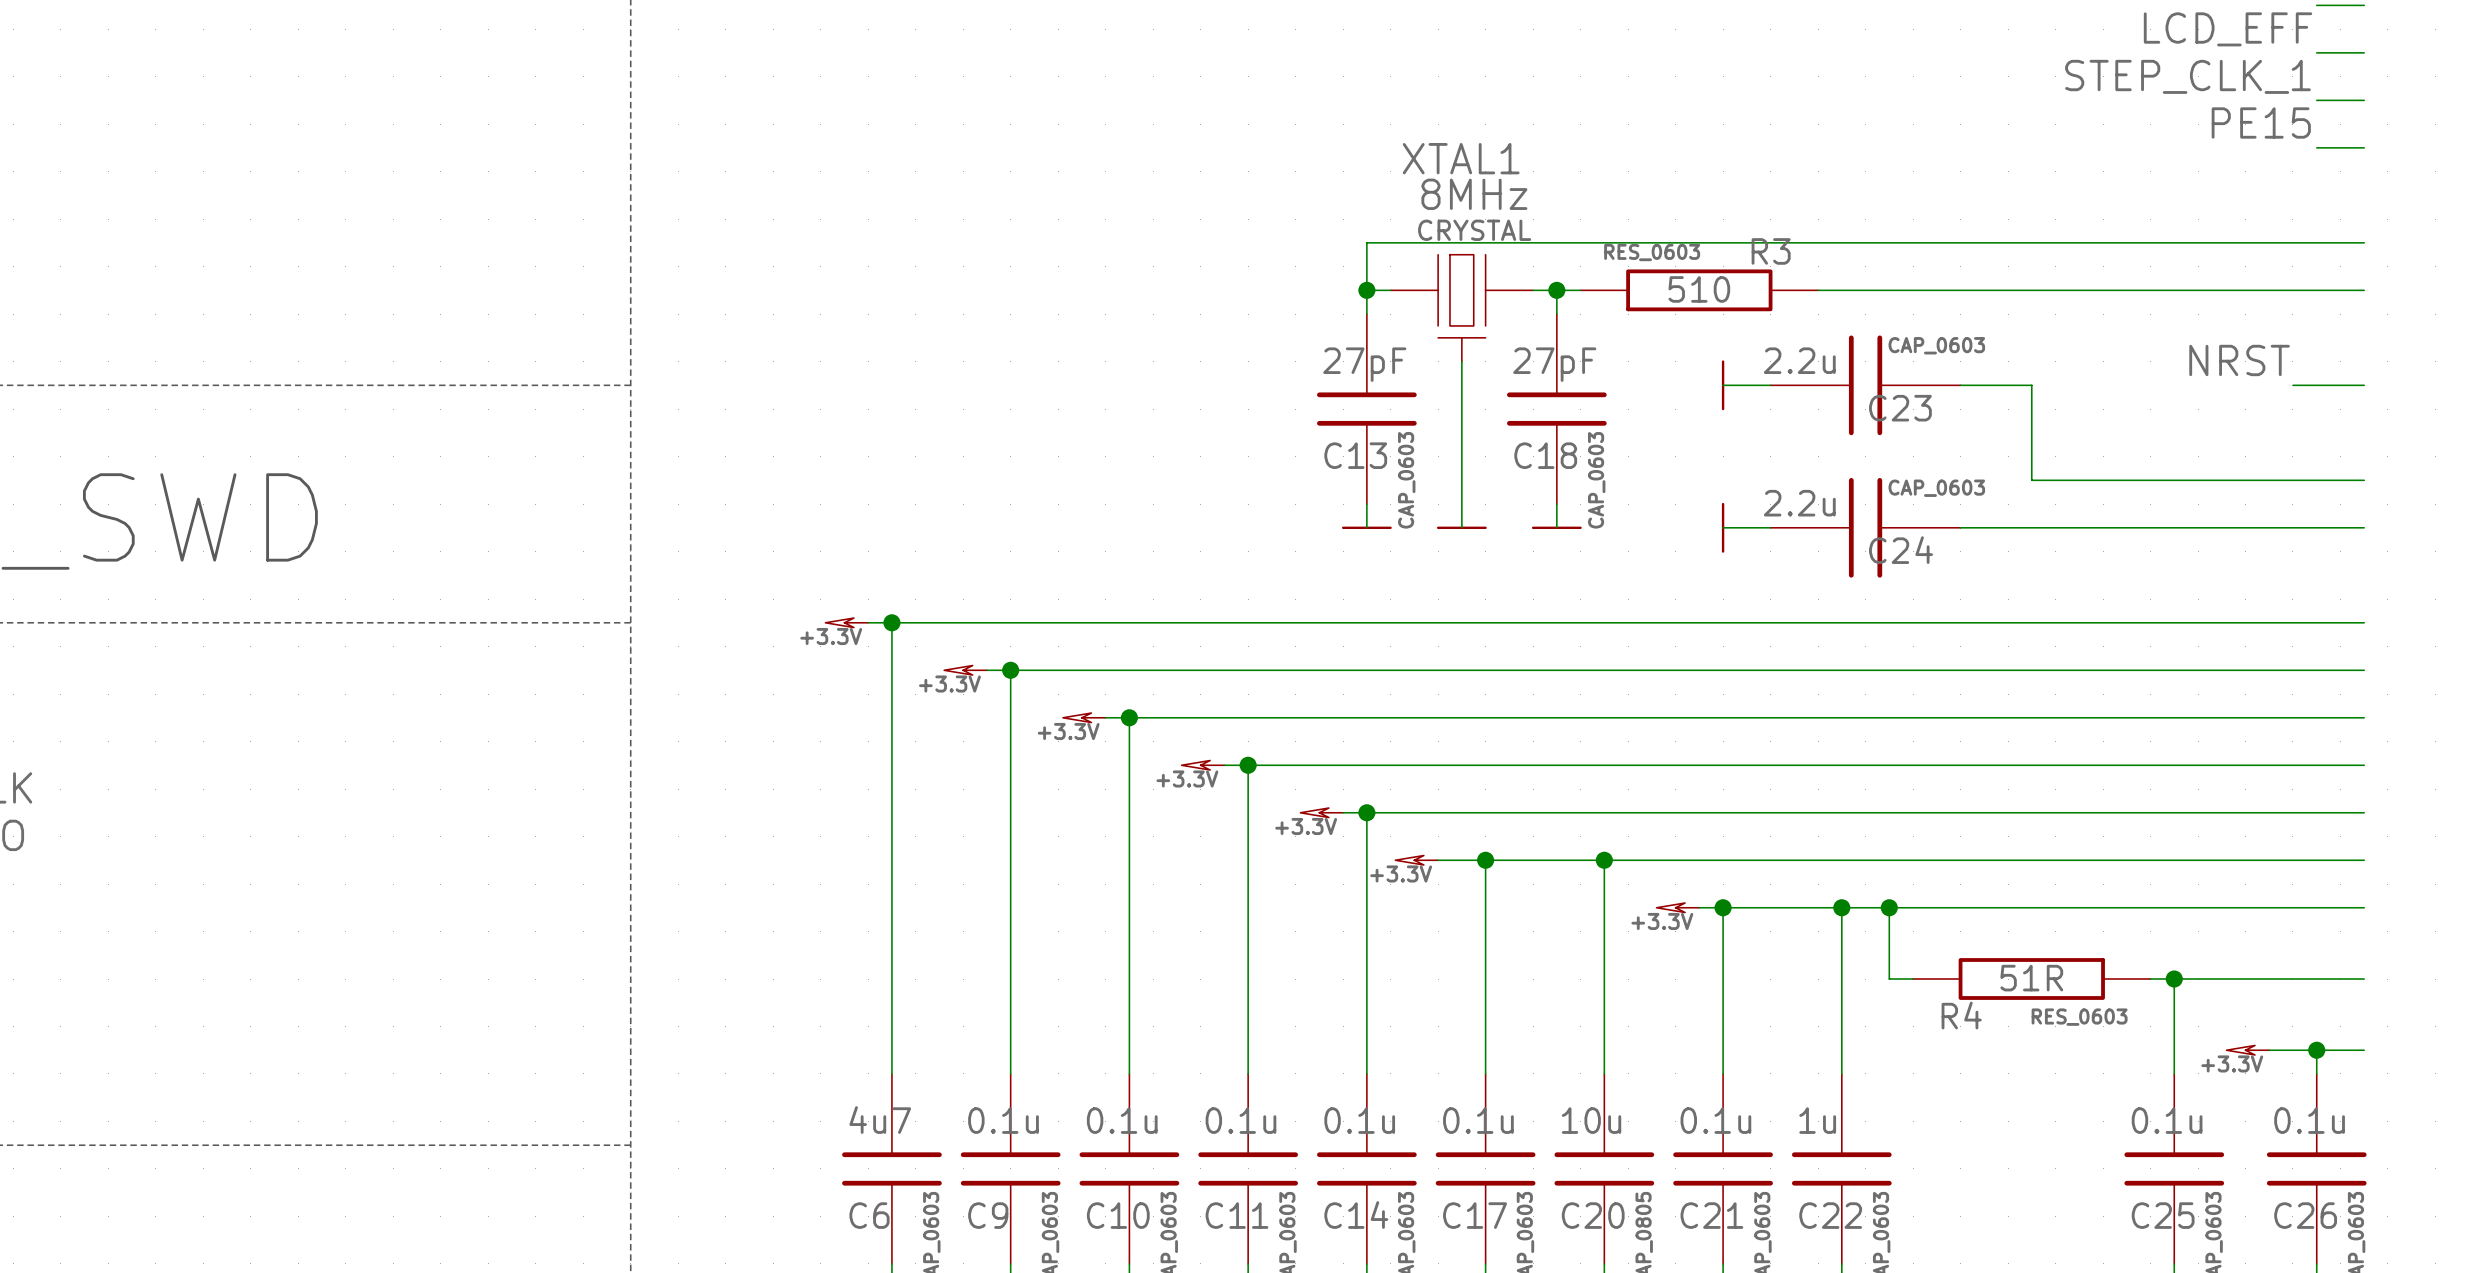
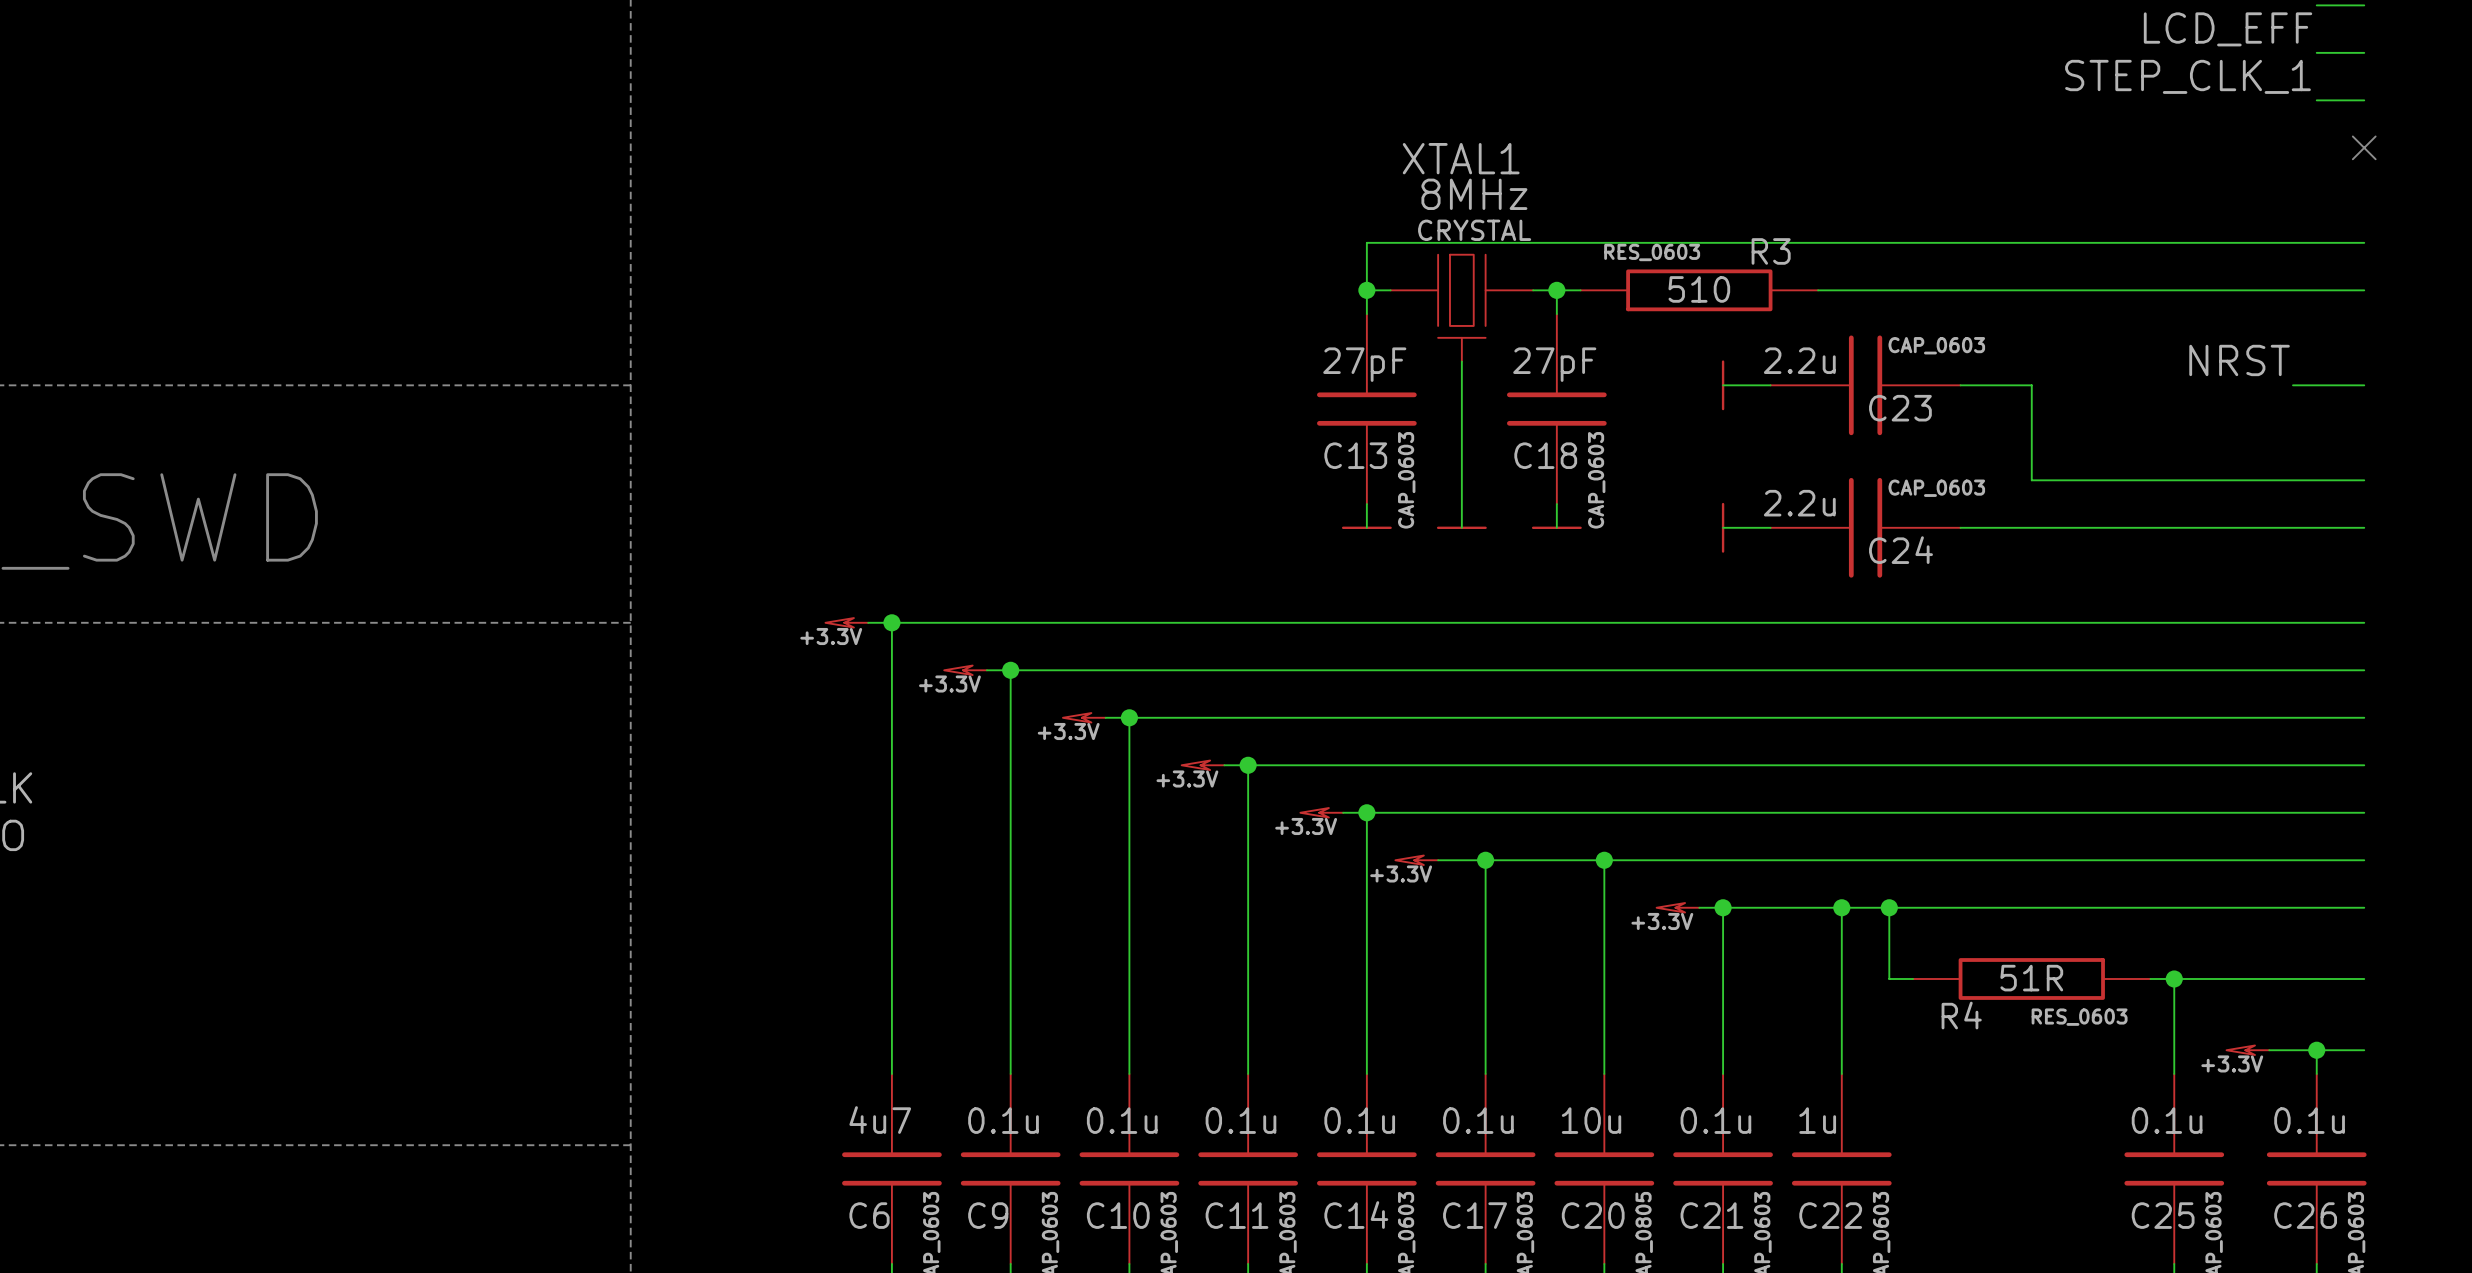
label: PE15 (2261, 123) -> none
wire: (2316, 147) (2364, 147) -> none
no-connect mark: none -> (2364, 147)

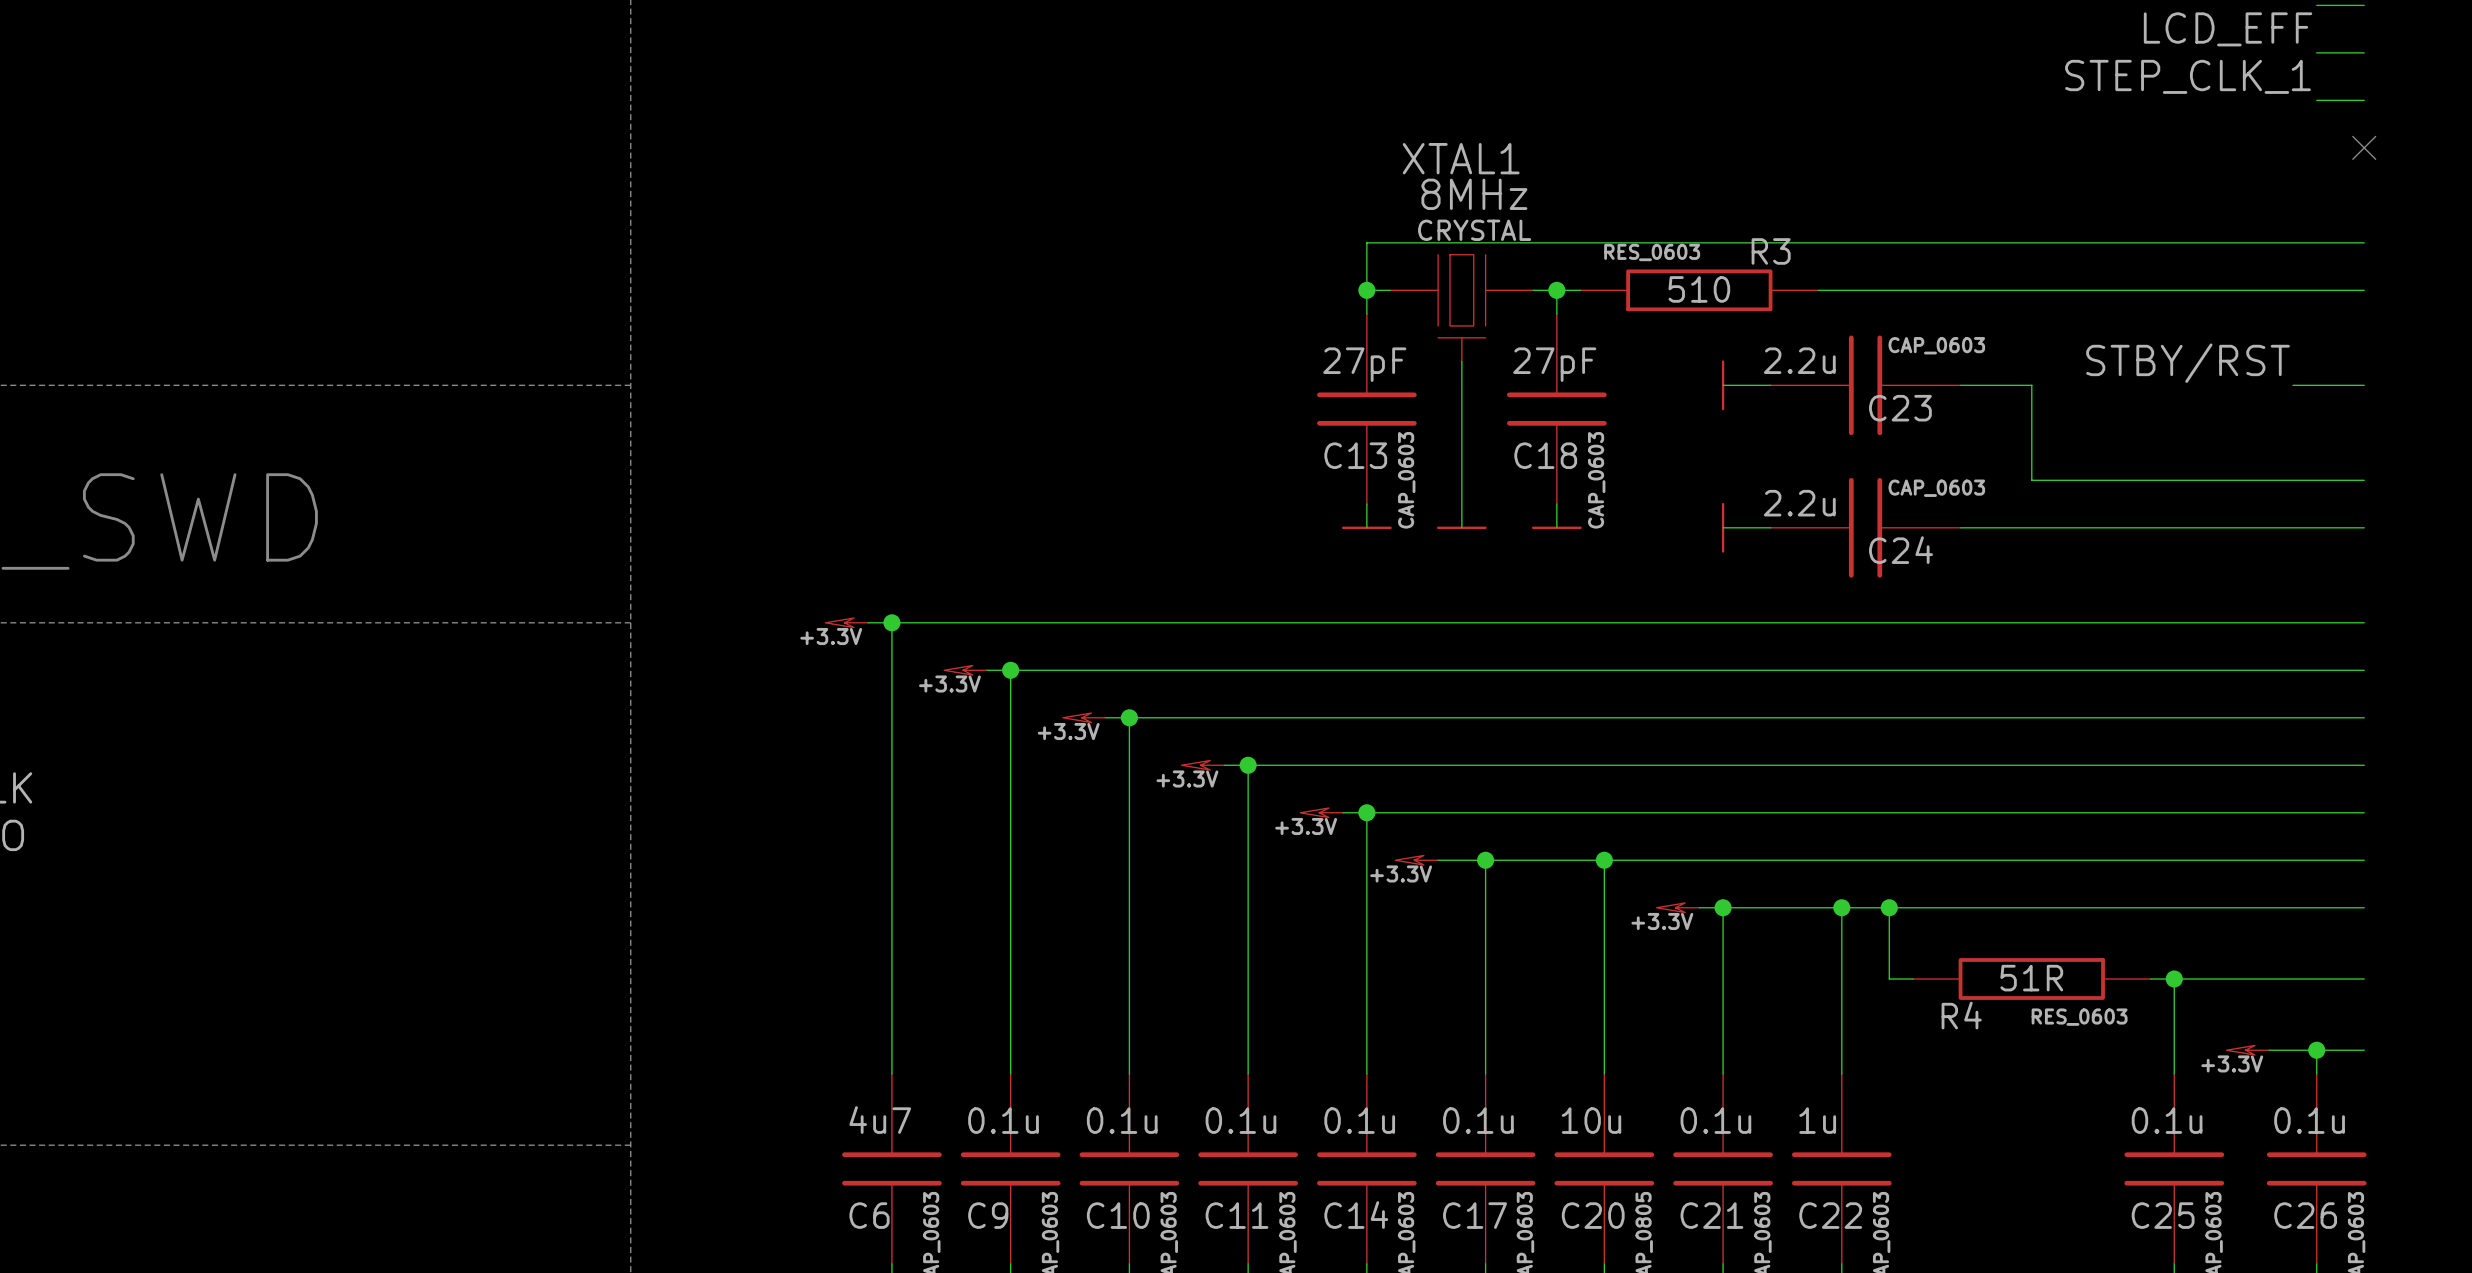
label: NRST (2239, 360) -> STBY/RST (2187, 363)

